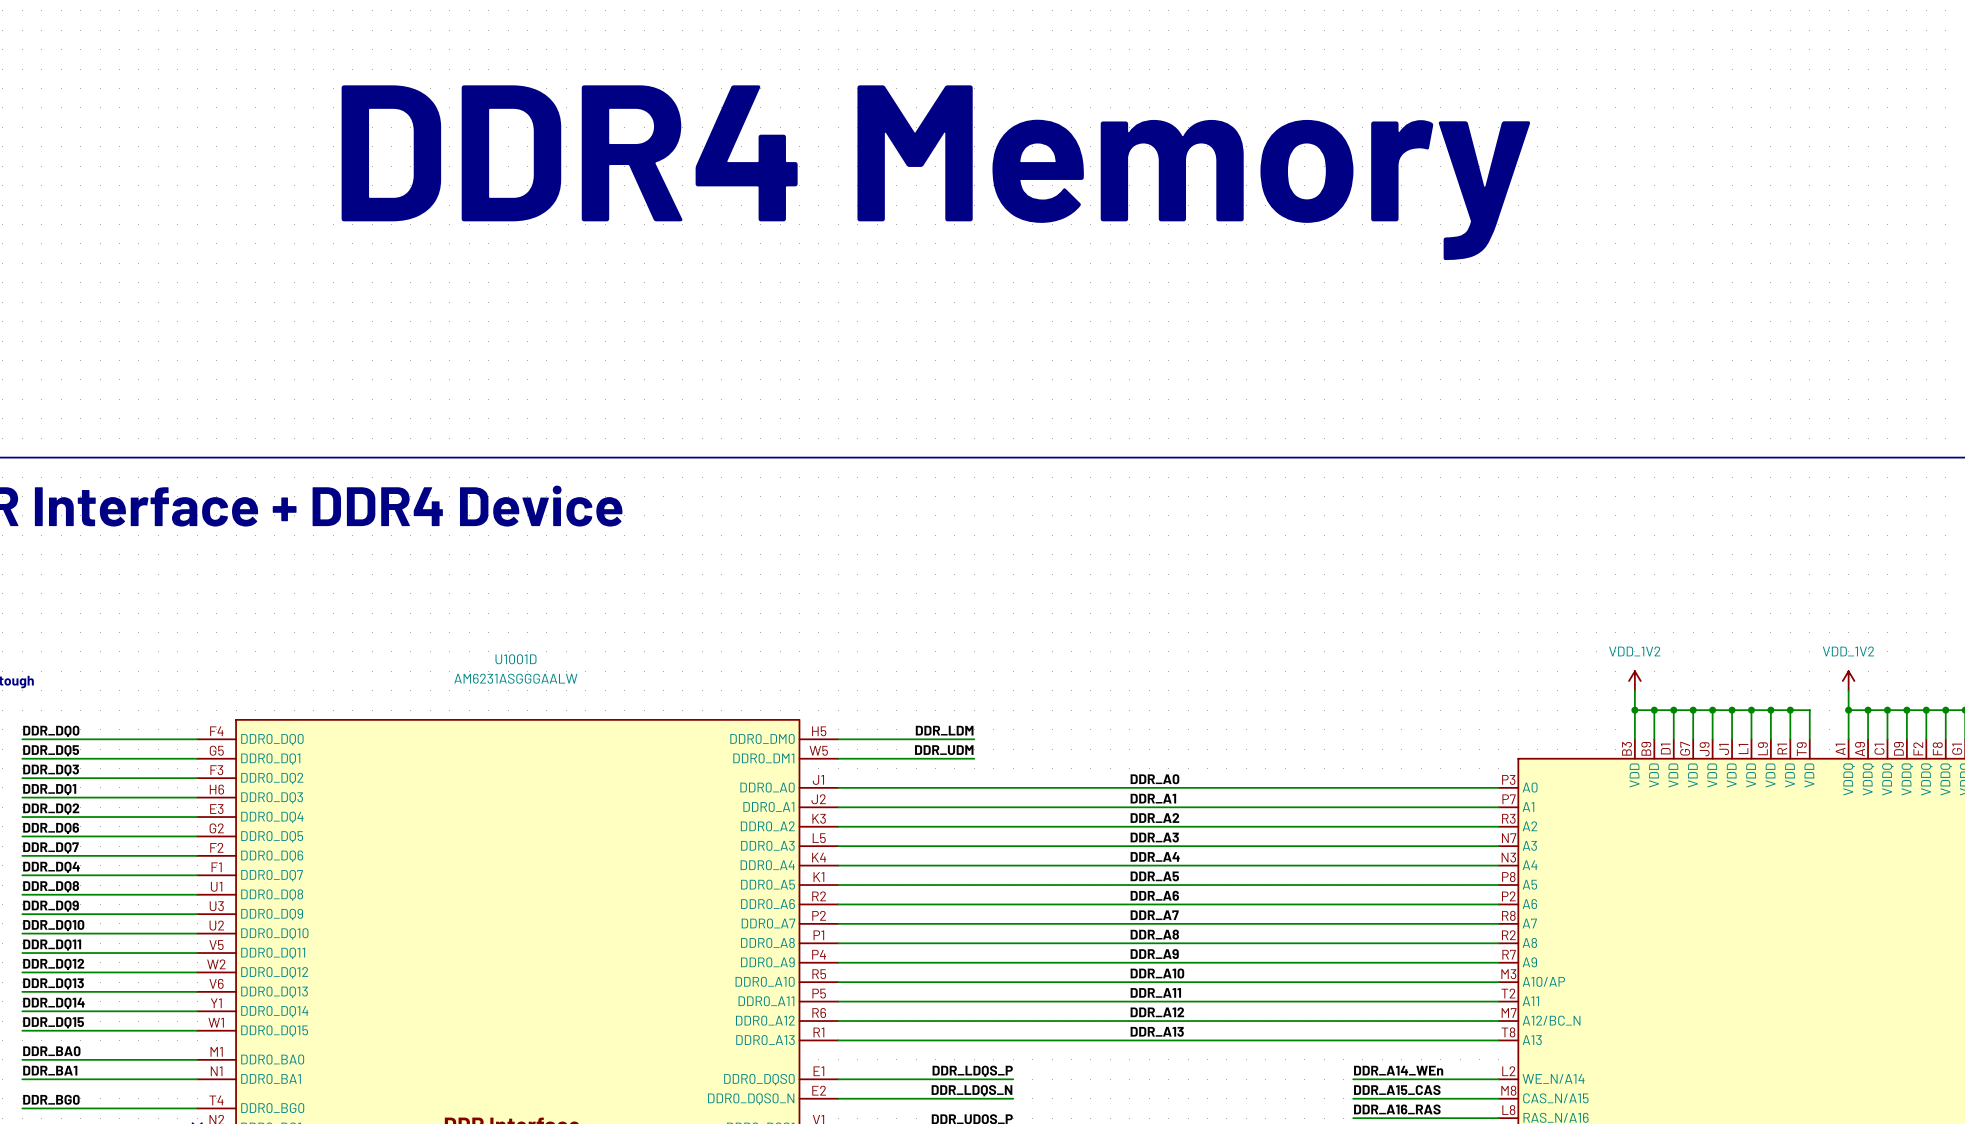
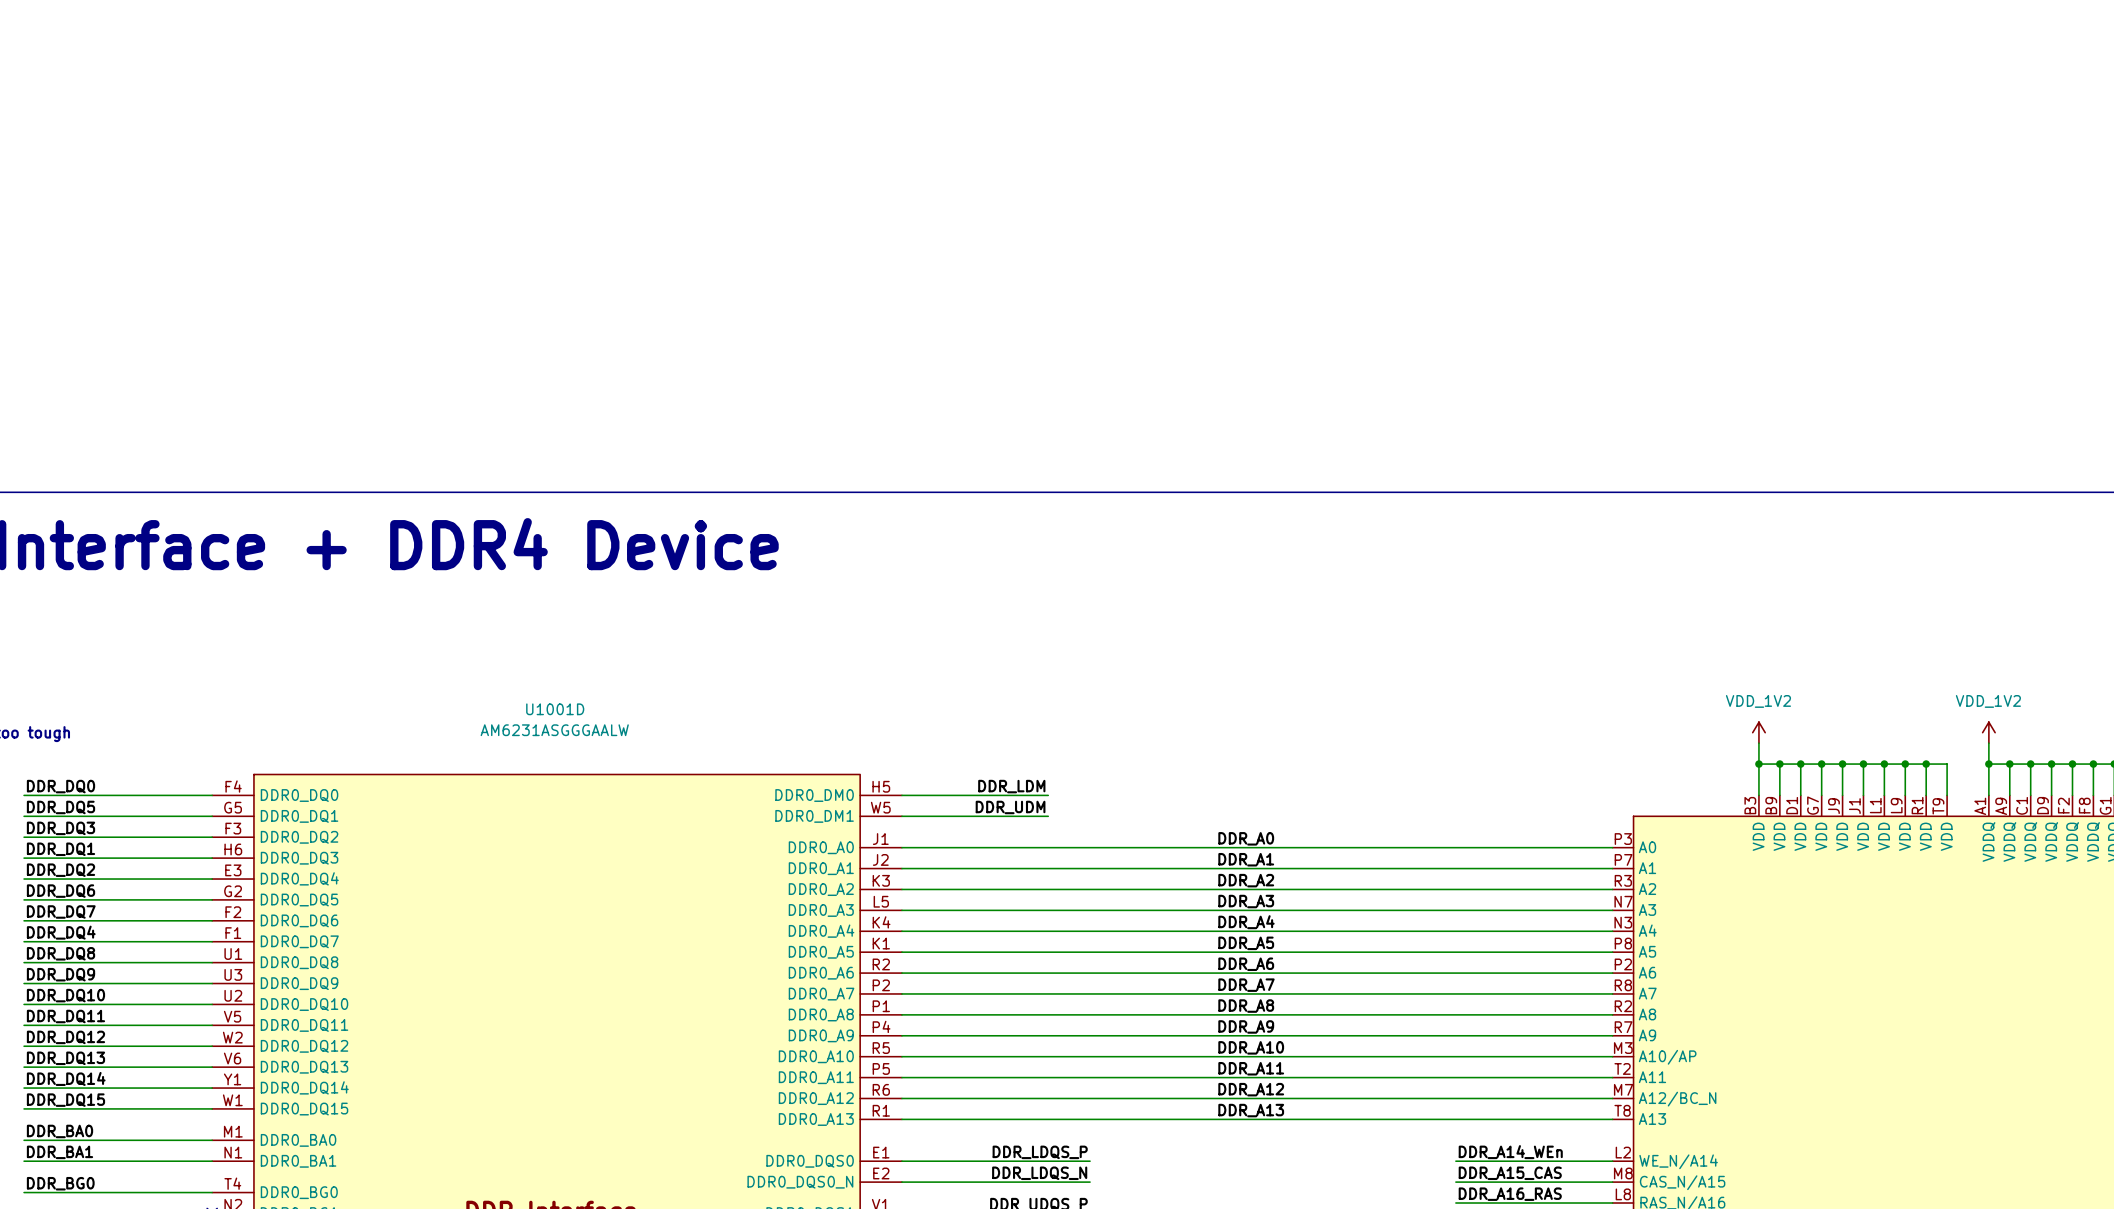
text: DDR4 Memory (935, 172) -> none

